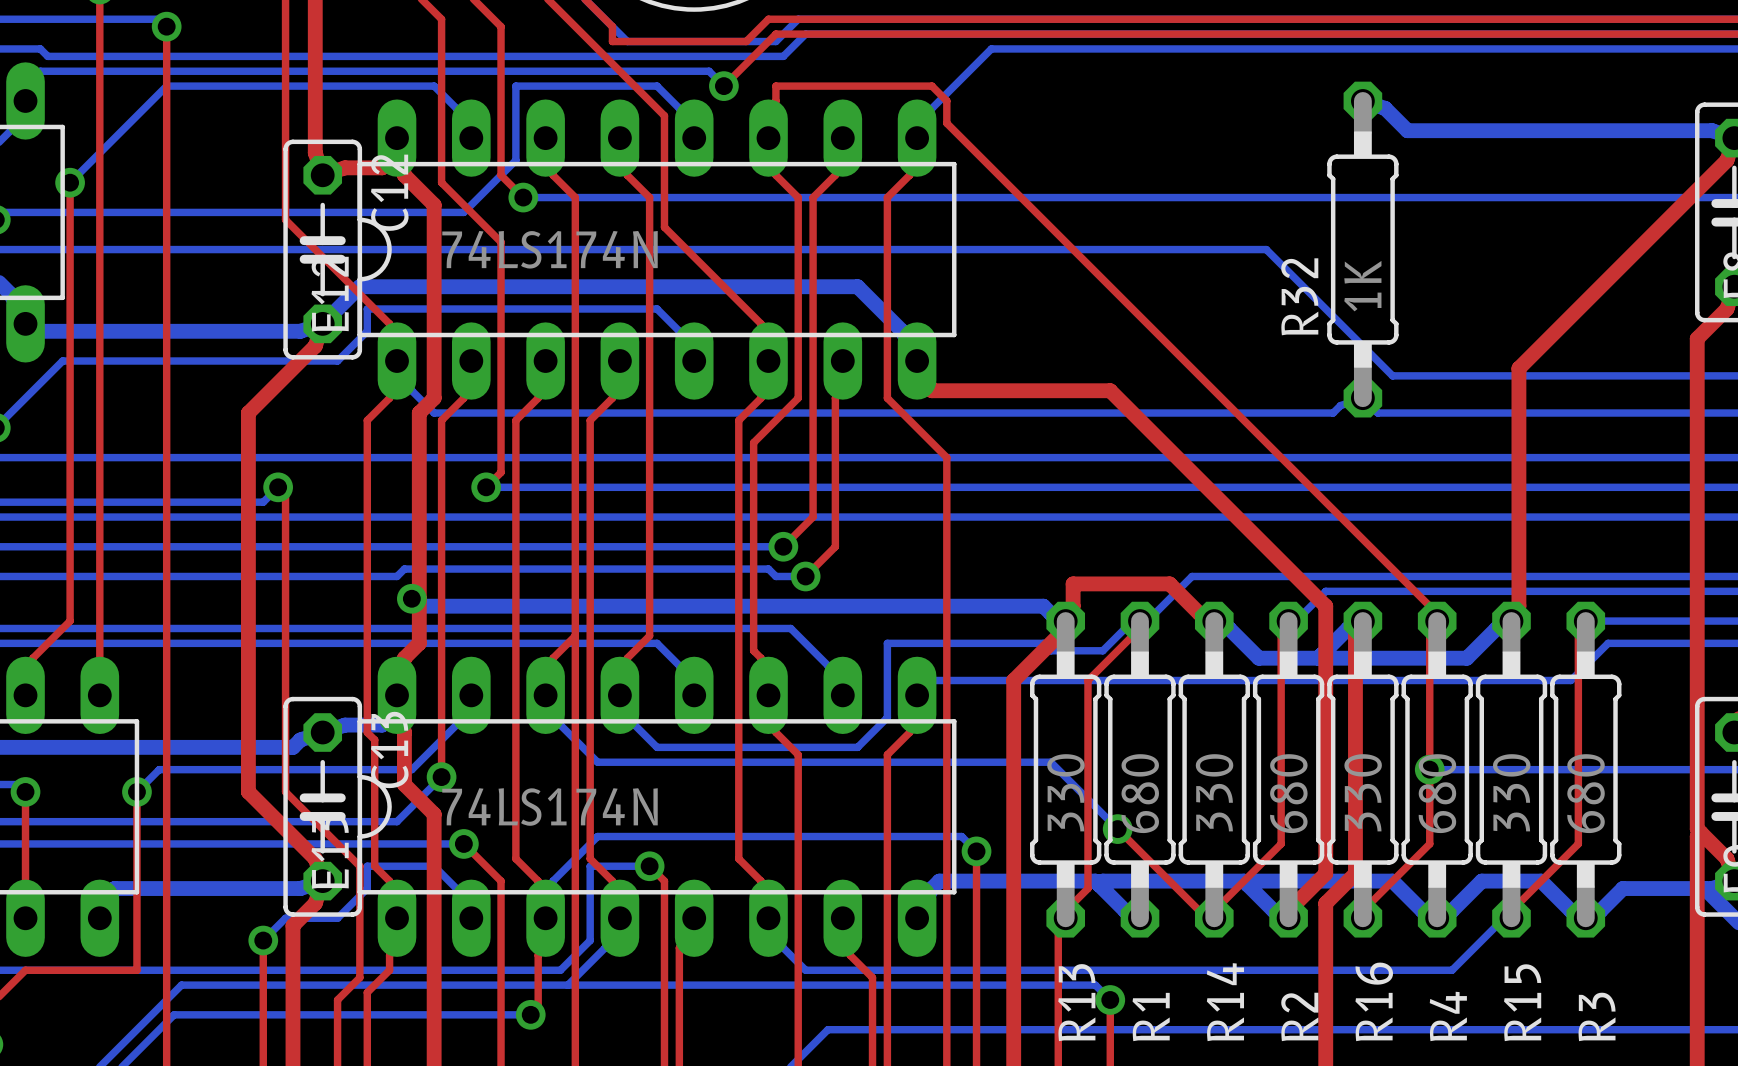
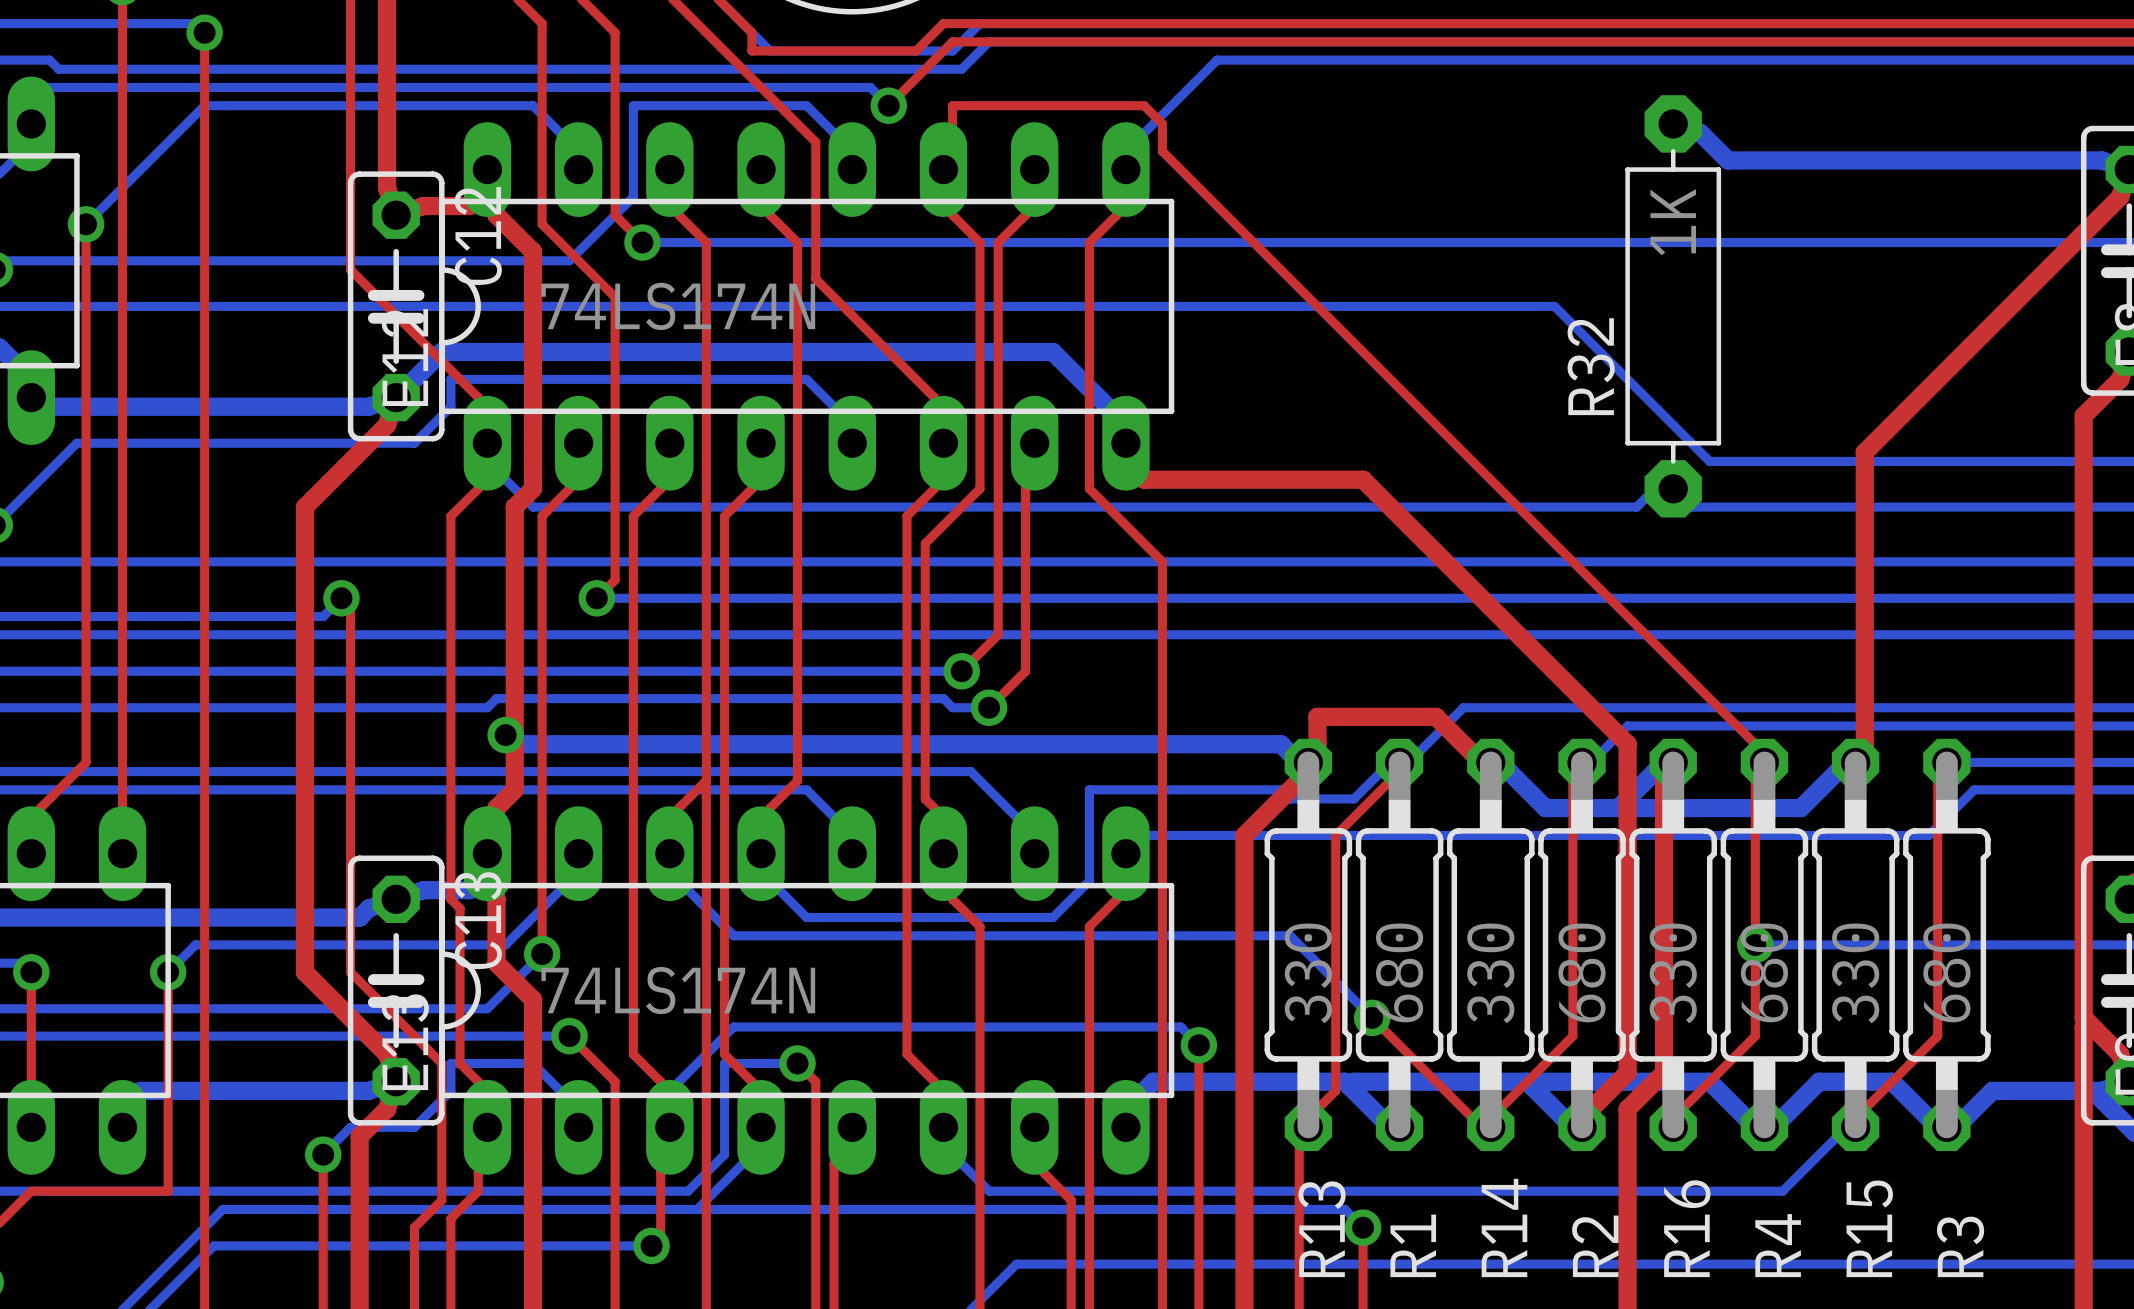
R32 footprint: [1327, 81, 1399, 418] -> [1625, 95, 1722, 518]
R32 value position: 1K (1362, 286) -> 1K (1673, 222)

